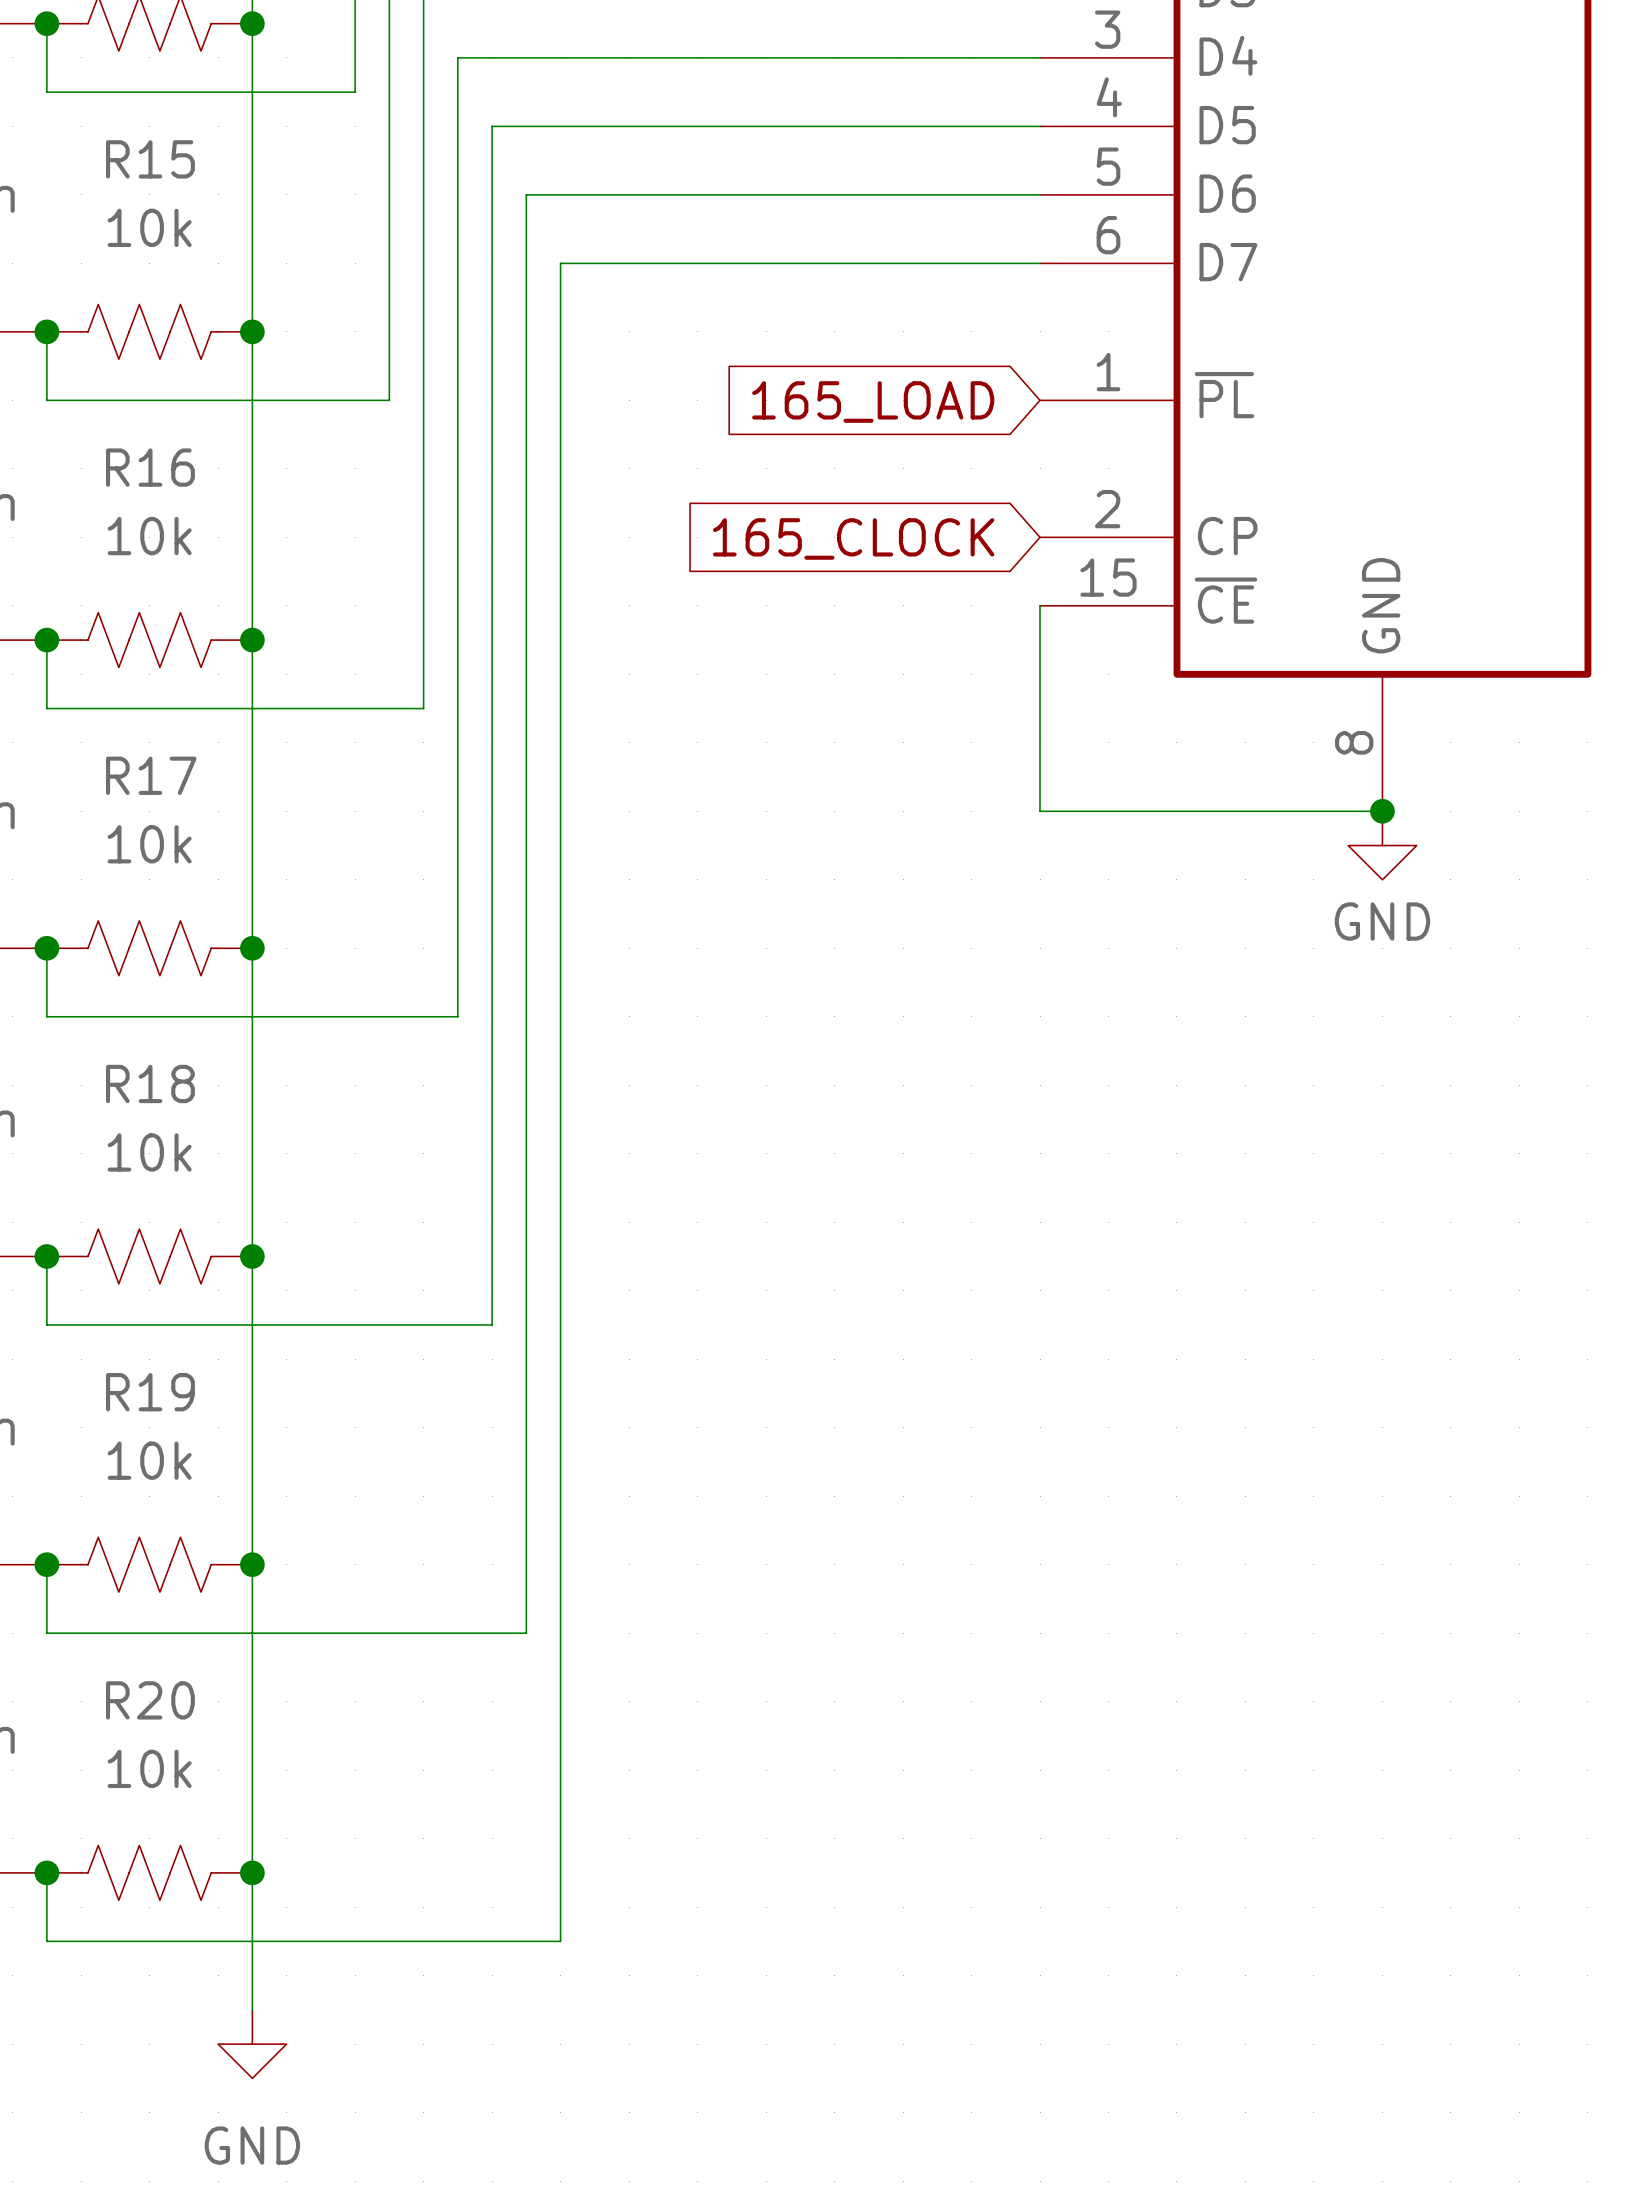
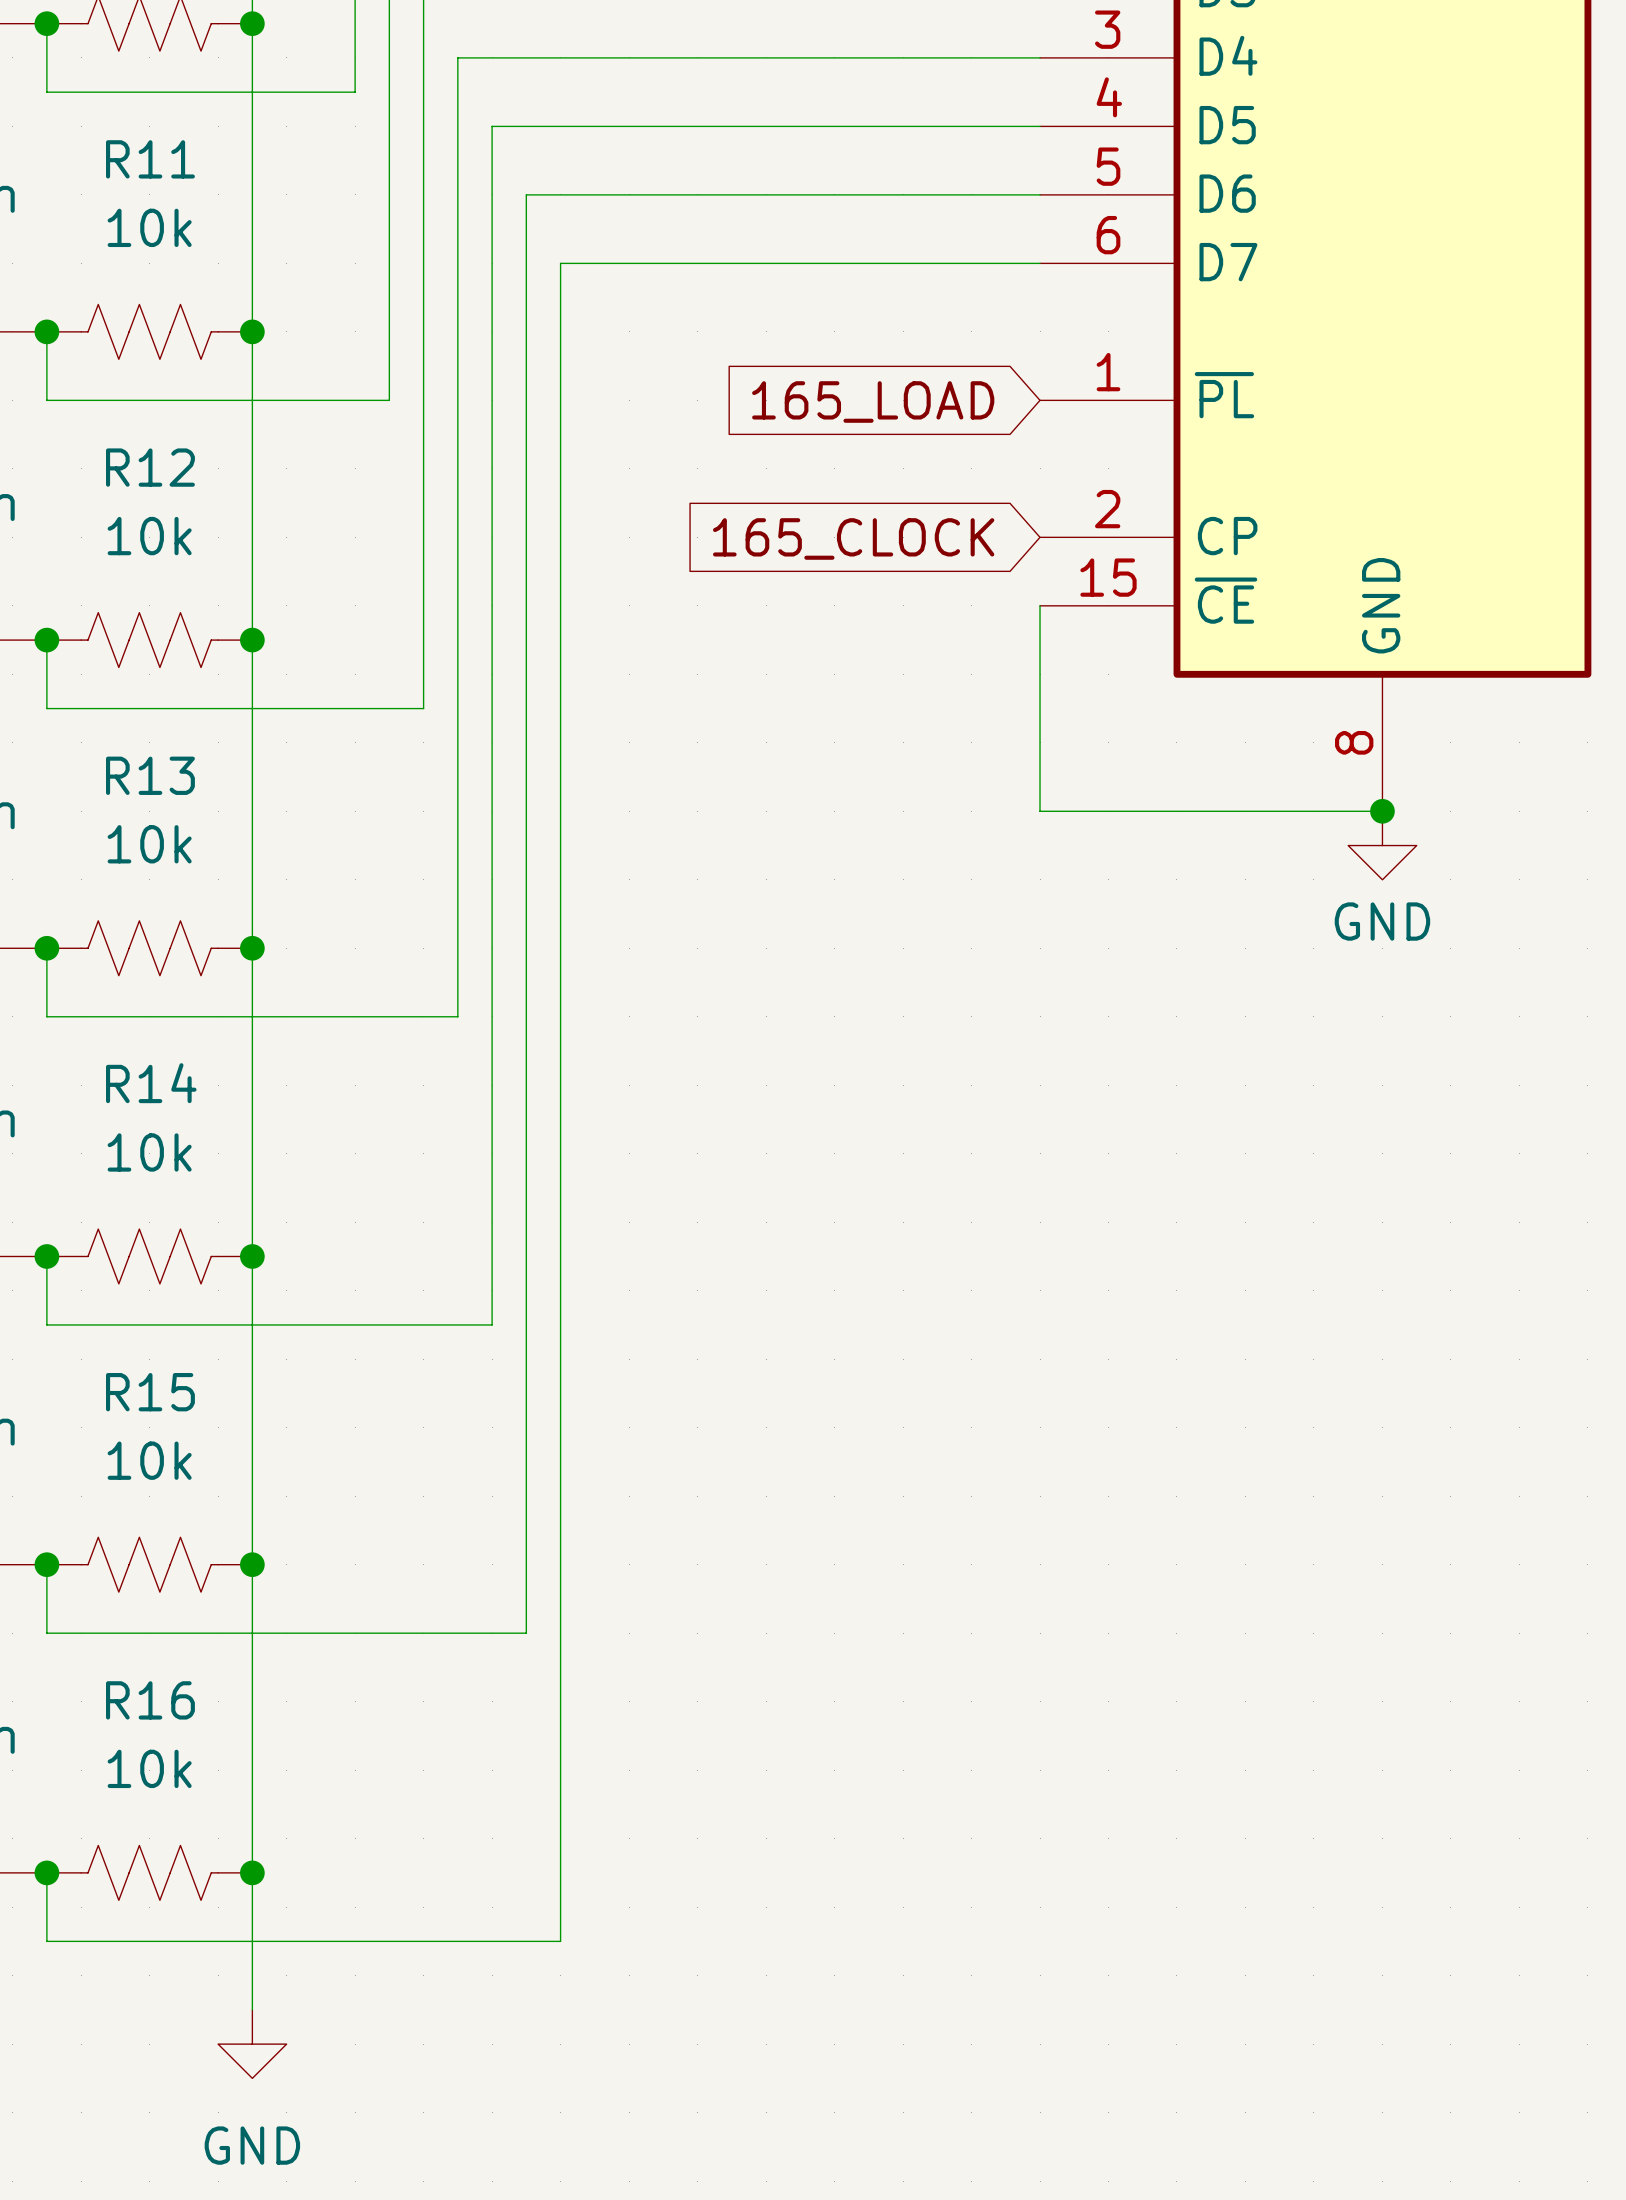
R15 name: R15 (150, 159) -> R11 (150, 159)
R16 name: R16 (150, 467) -> R12 (150, 467)
R17 name: R17 (151, 775) -> R13 (150, 775)
R18 name: R18 (150, 1083) -> R14 (151, 1083)
R19 name: R19 (150, 1392) -> R15 (150, 1392)
R20 name: R20 (150, 1700) -> R16 (150, 1700)

